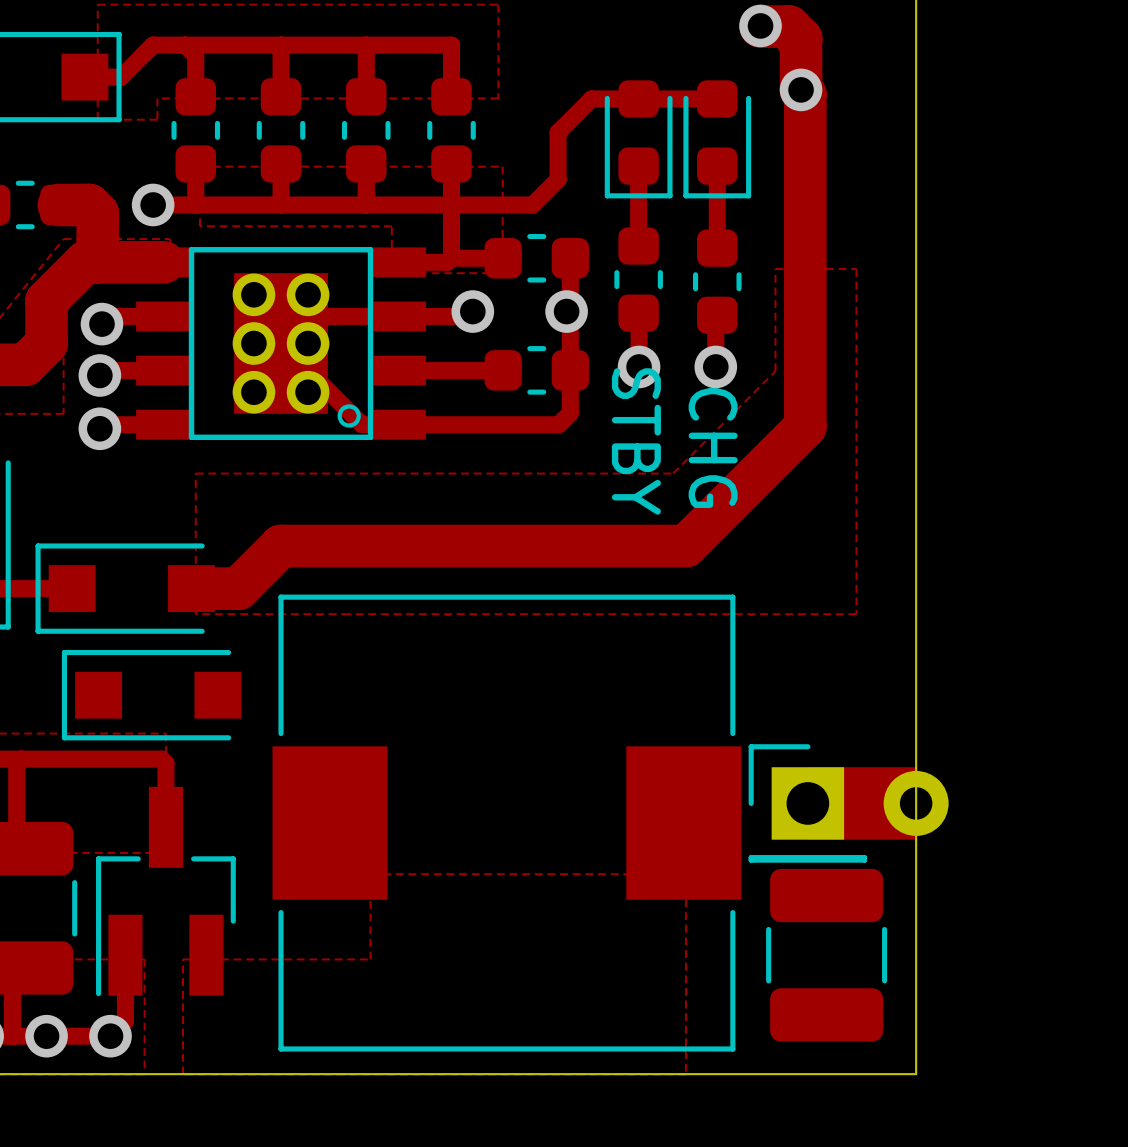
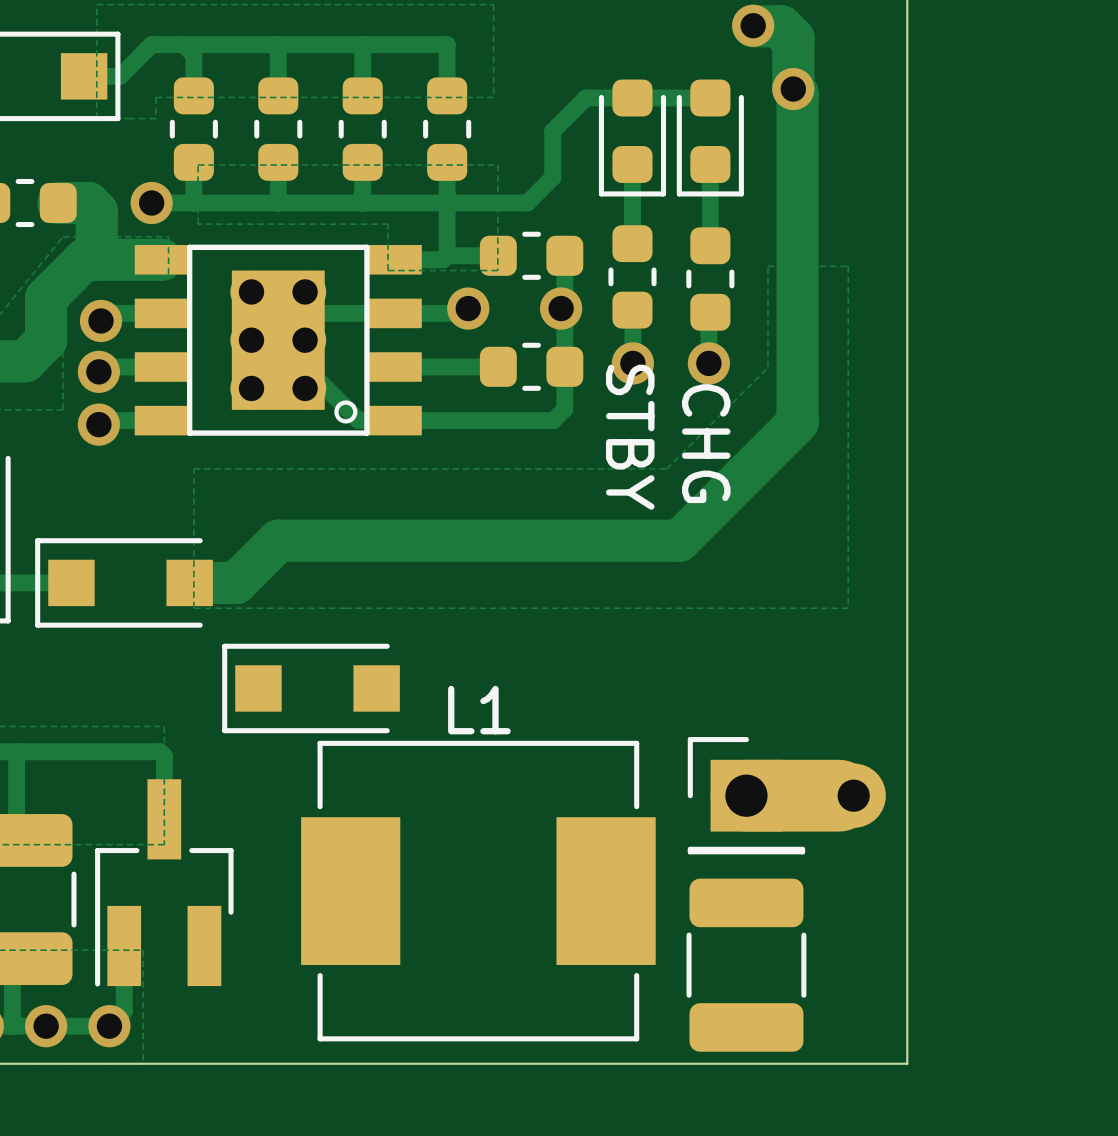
part position: (151, 695) -> (311, 688)
part: none -> (786, 795)
part: (848, 803) -> none
part: (506, 823) -> none
zone outline: (370, 874) (370, 959) (182, 959) (182, 1074) (685, 1074) (685, 874) (370, 874) -> none
L1: none -> (478, 891)
part: (826, 955) -> none
part: none -> (746, 965)

